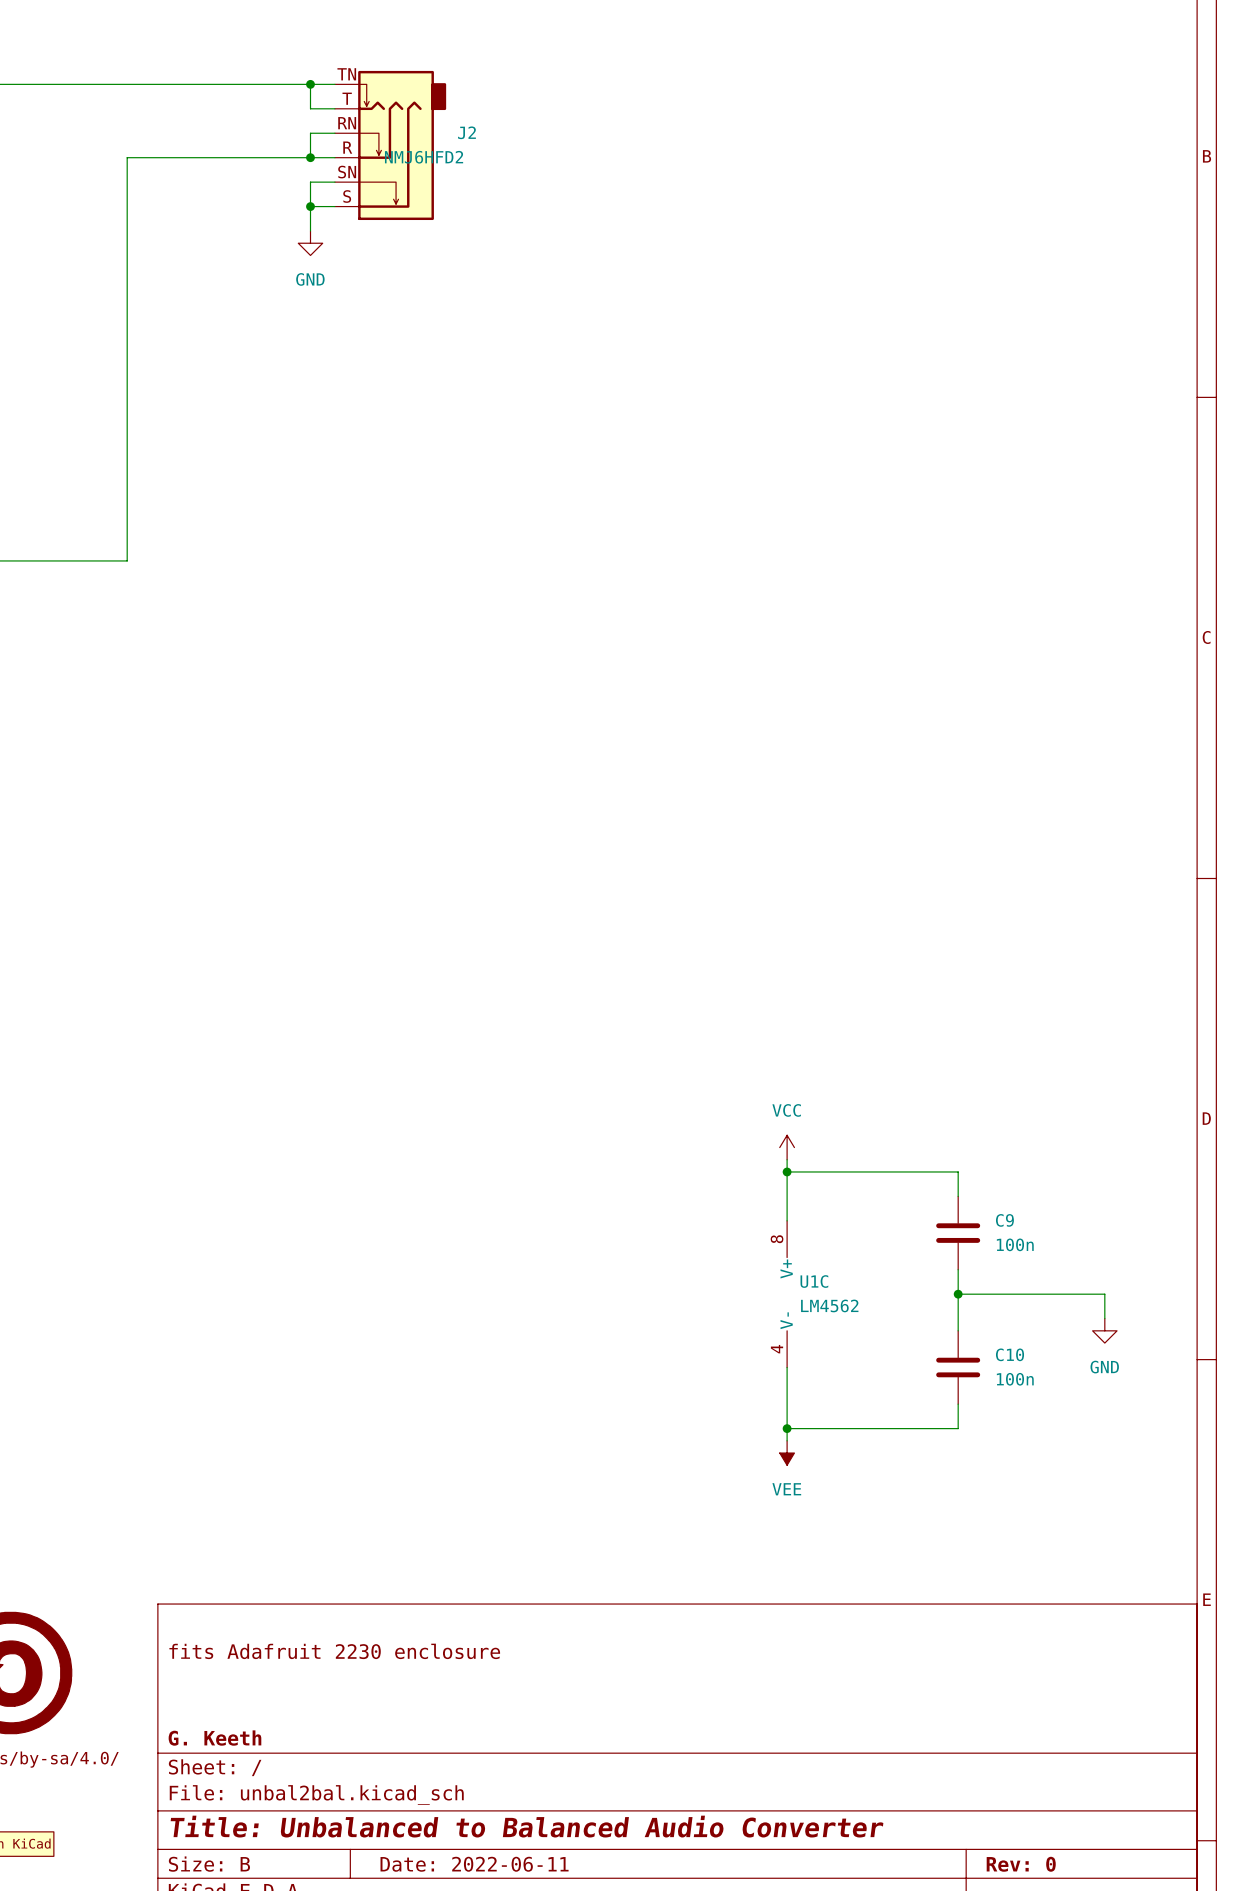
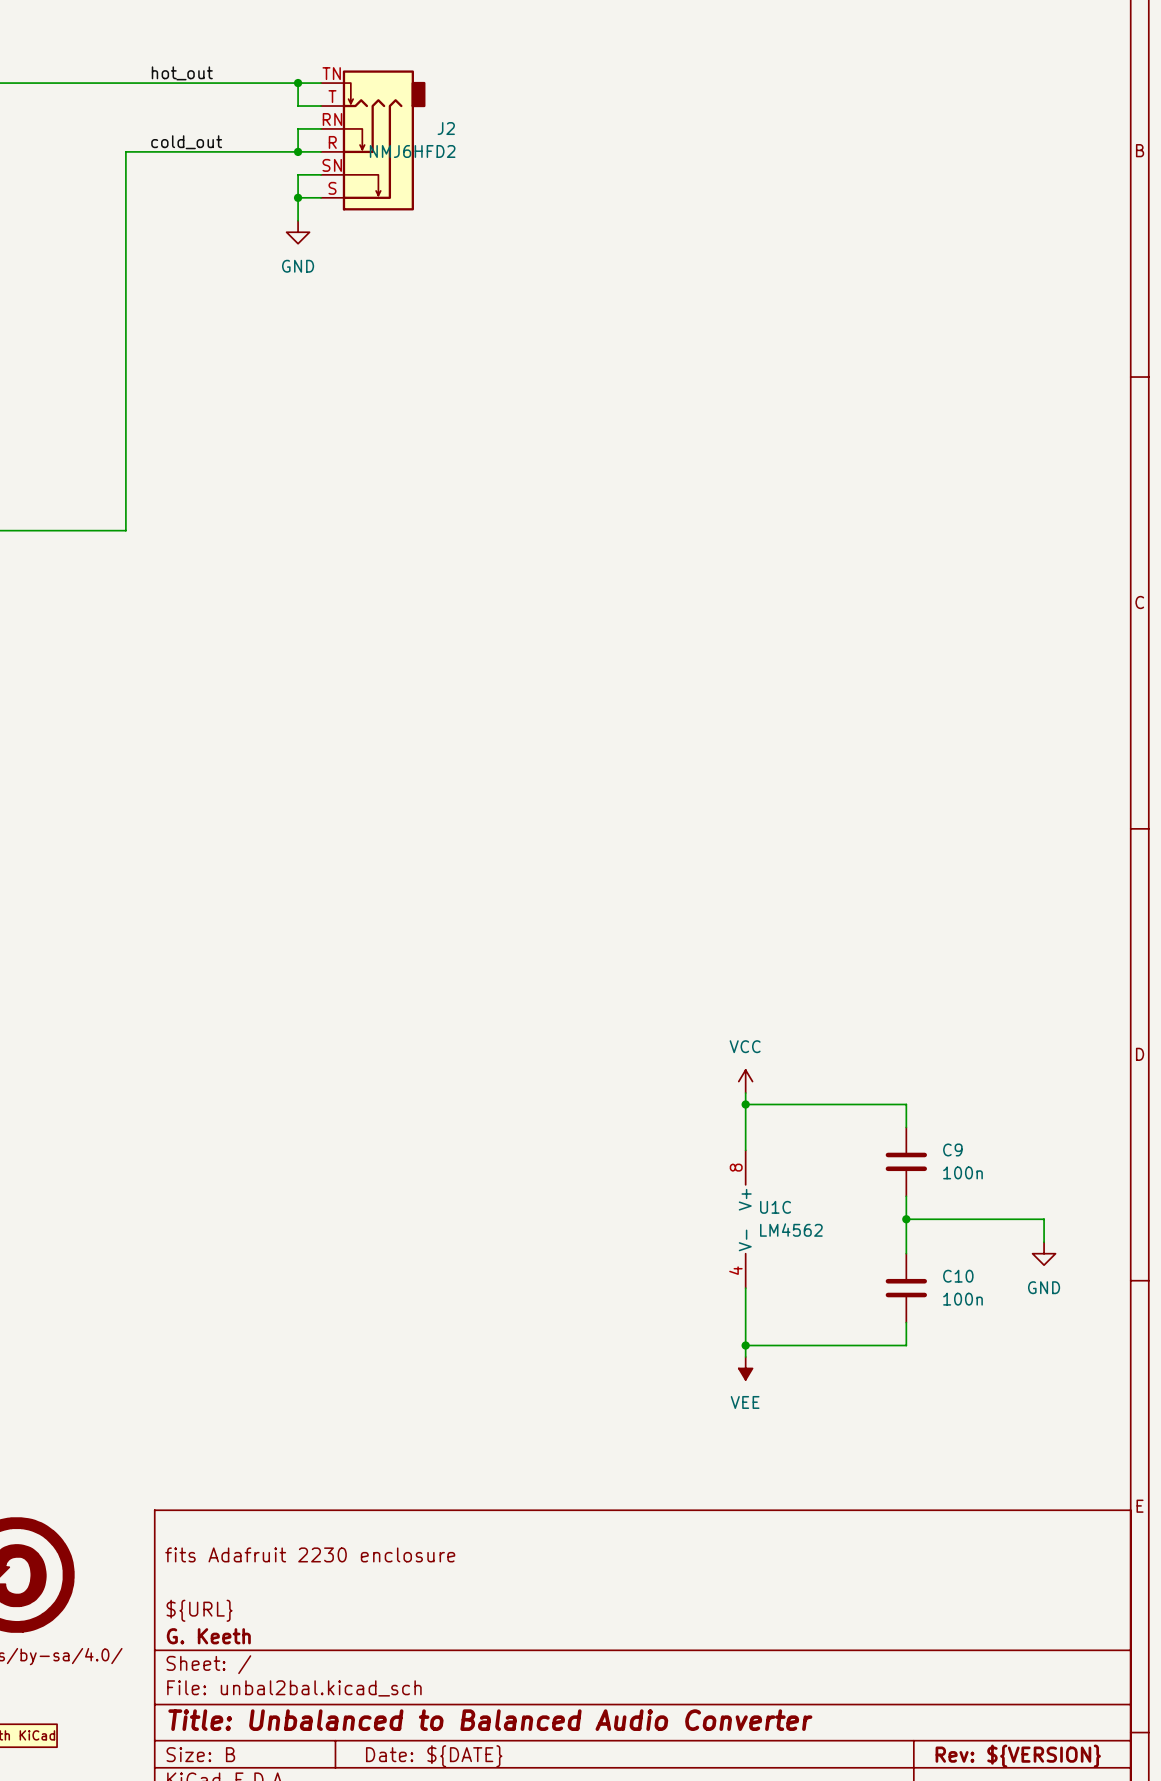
label: none -> hot_out (182, 73)
label: none -> cold_out (186, 142)
title block: none -> ${URL} (199, 1610)
title block: Date: 2022-06-11 (474, 1864) -> Date: ${DATE} (434, 1756)
title block: Rev: 0 (1021, 1864) -> Rev: ${VERSION} (1018, 1756)

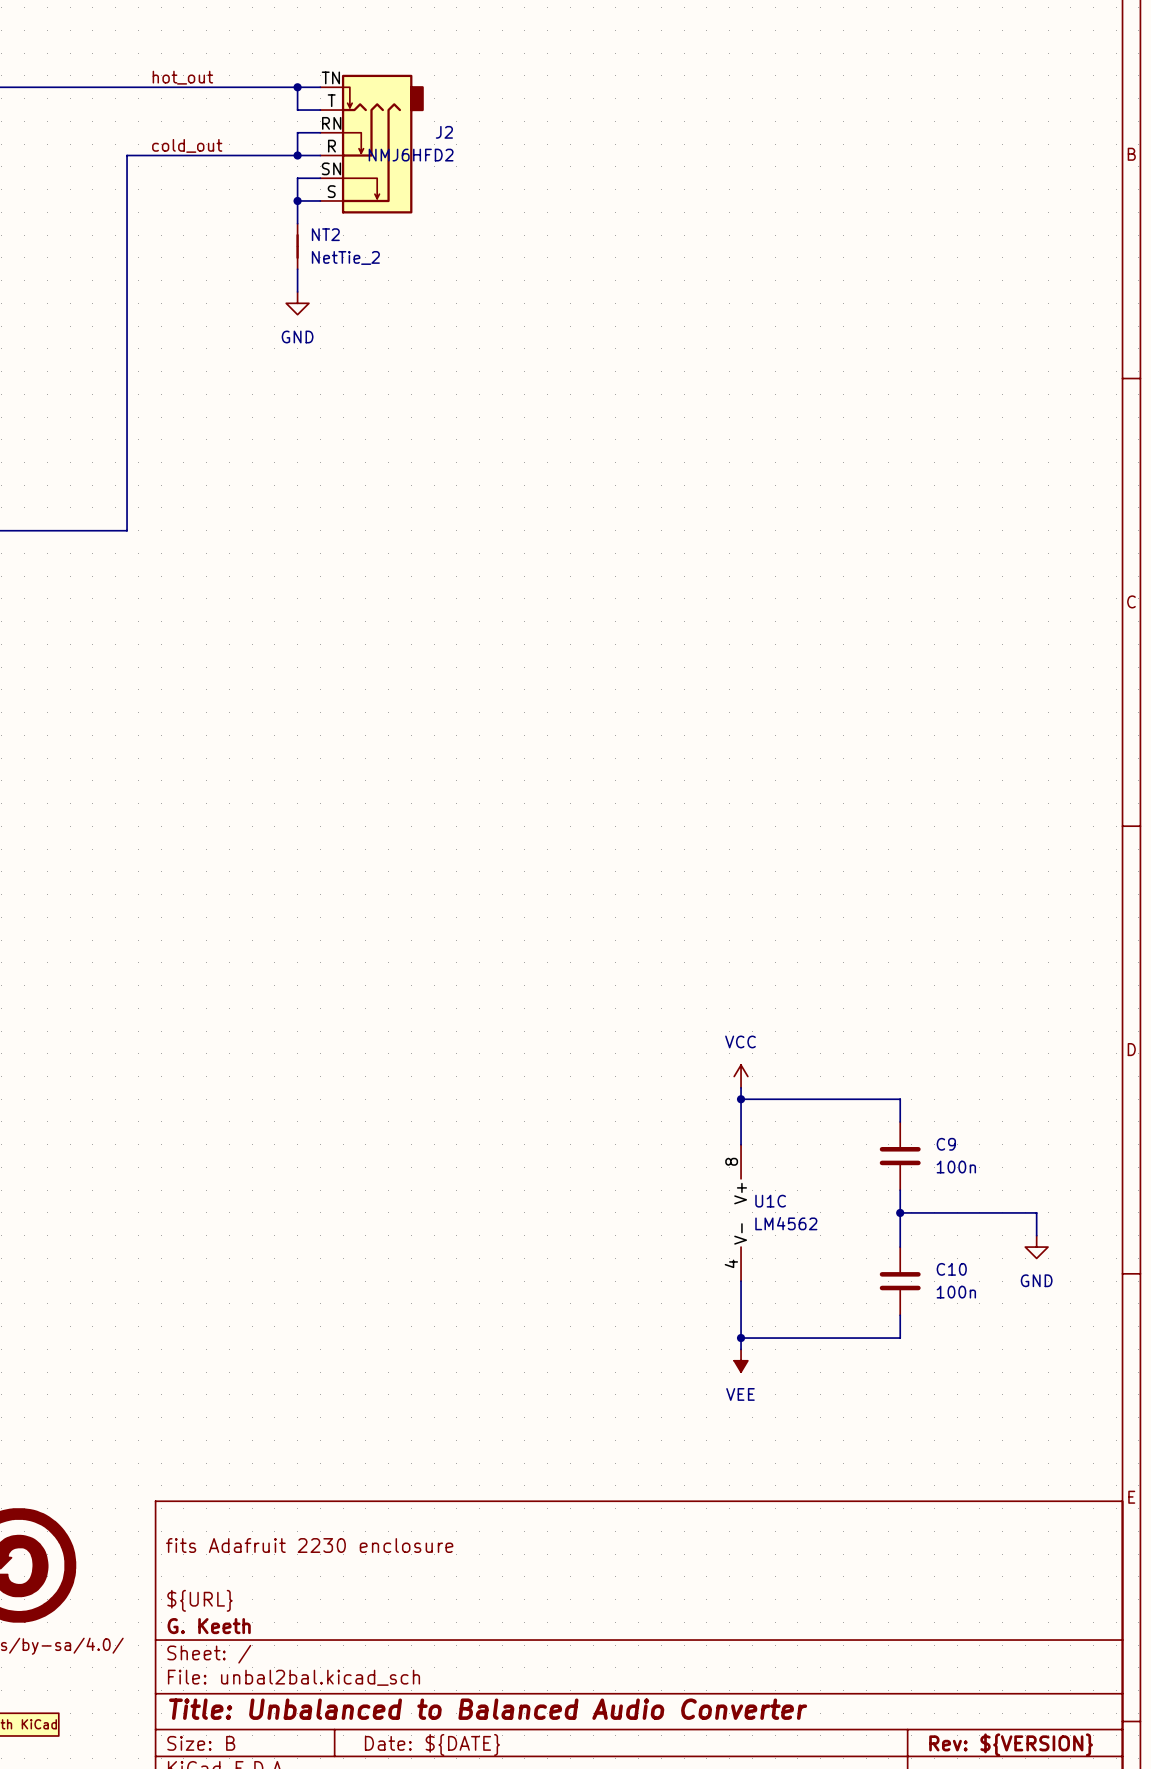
power symbol position: GND (298, 232) -> GND (297, 303)
NT2: none -> NetTie_2 (297, 246)
wire: none -> (297, 269) (297, 291)

